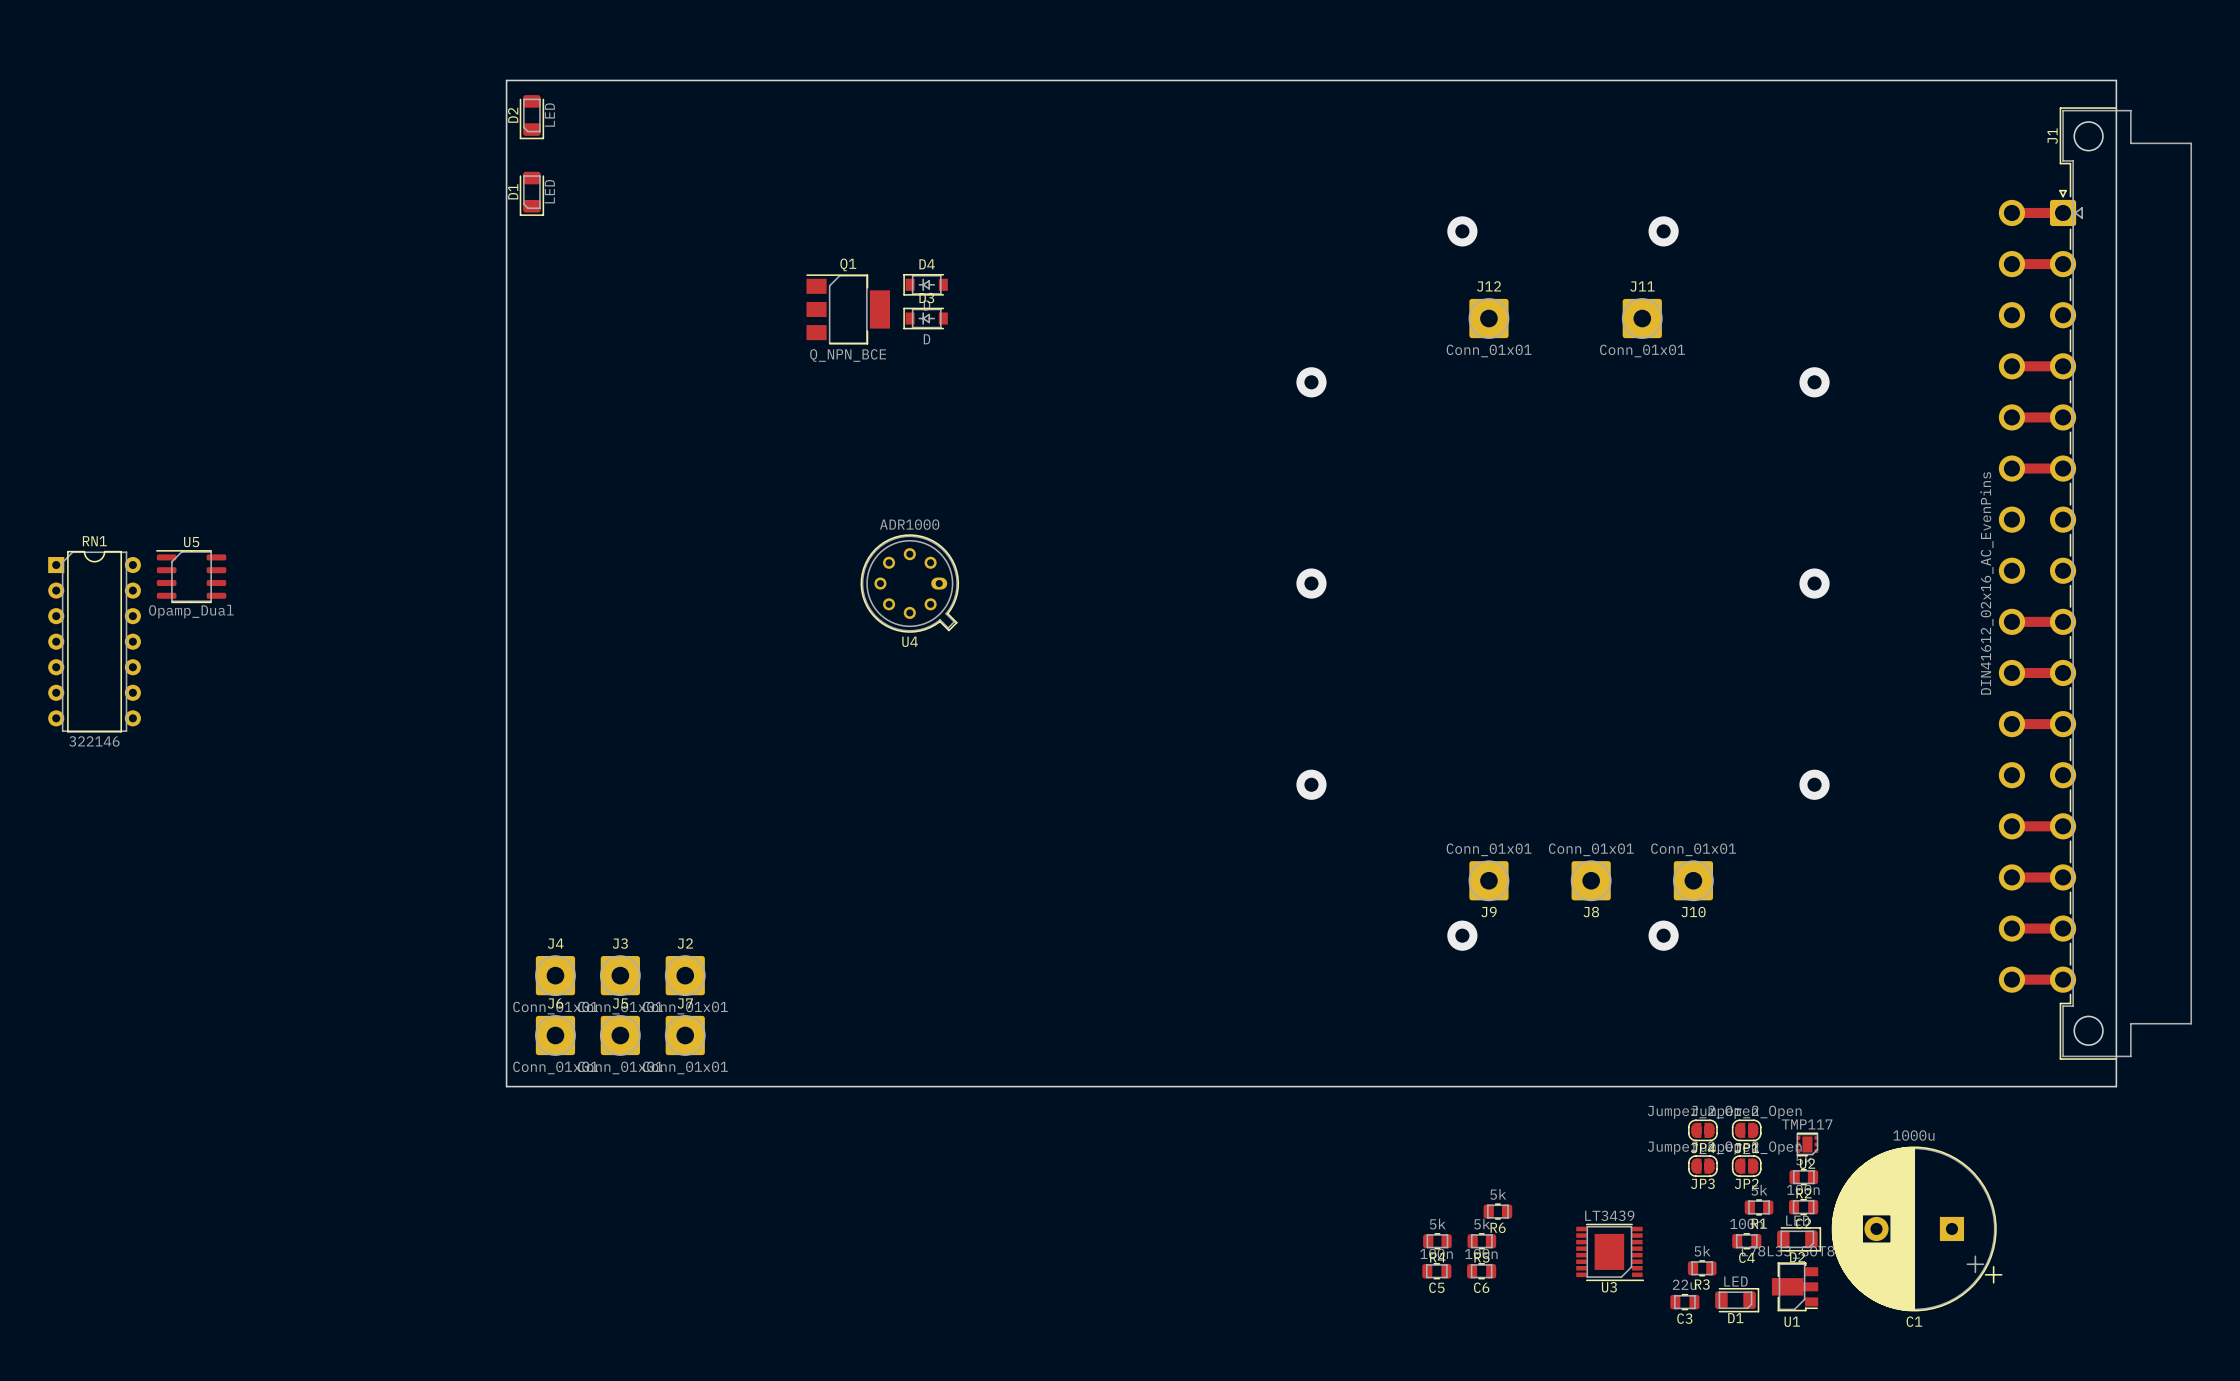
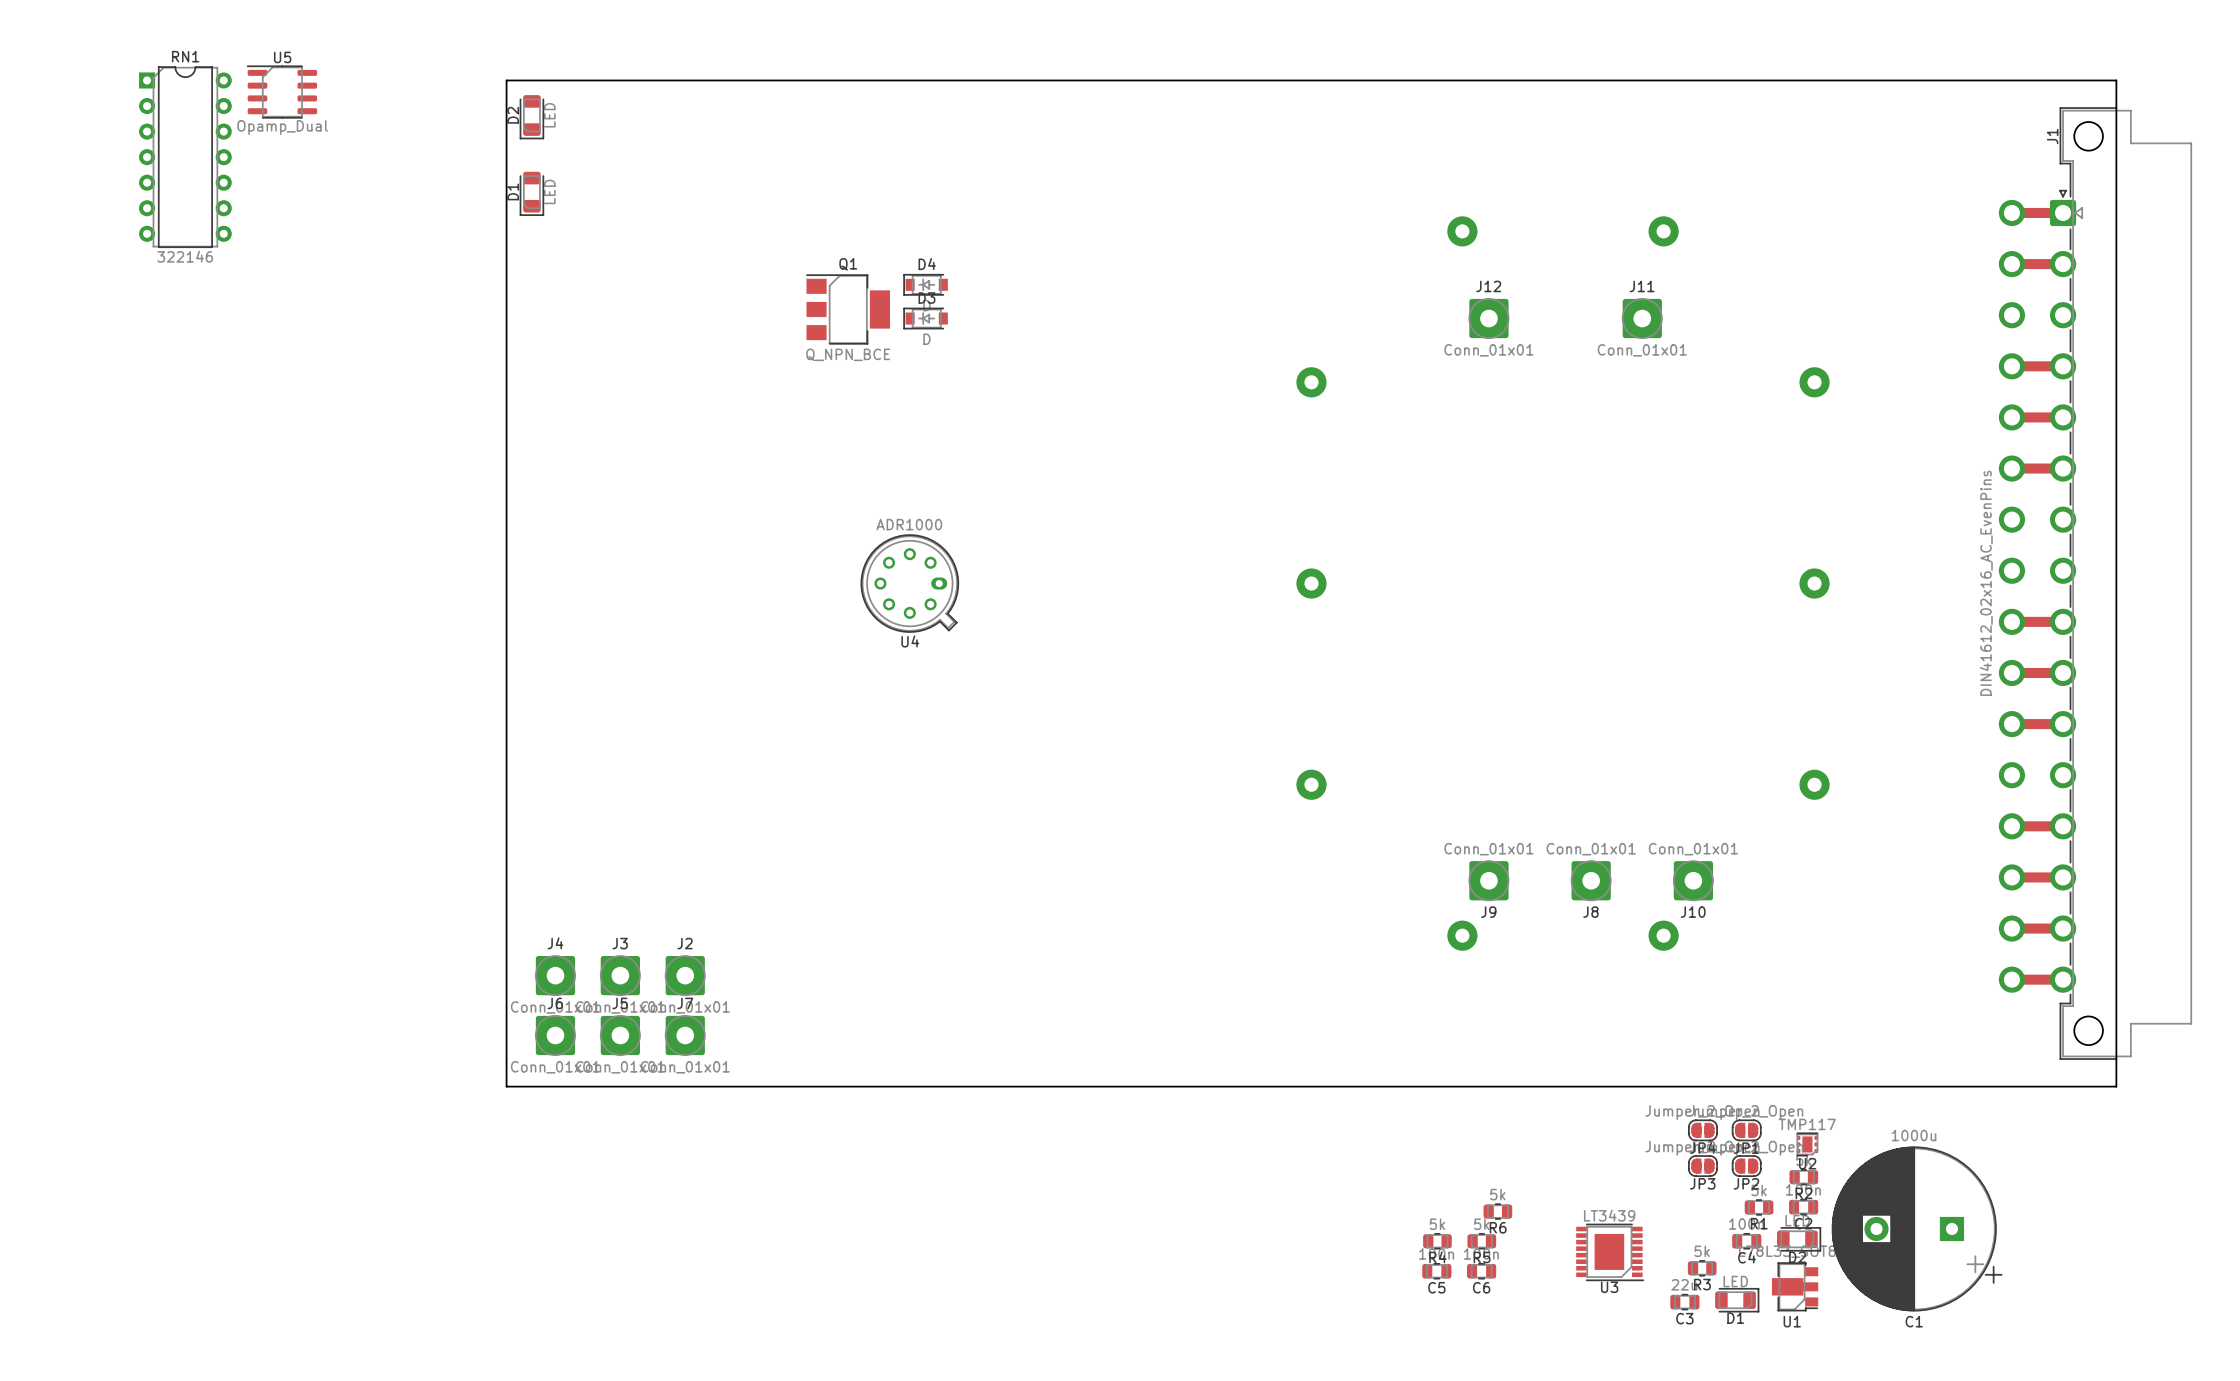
U5 position: (191, 576) -> (282, 92)
RN1 position: (94, 641) -> (185, 157)

